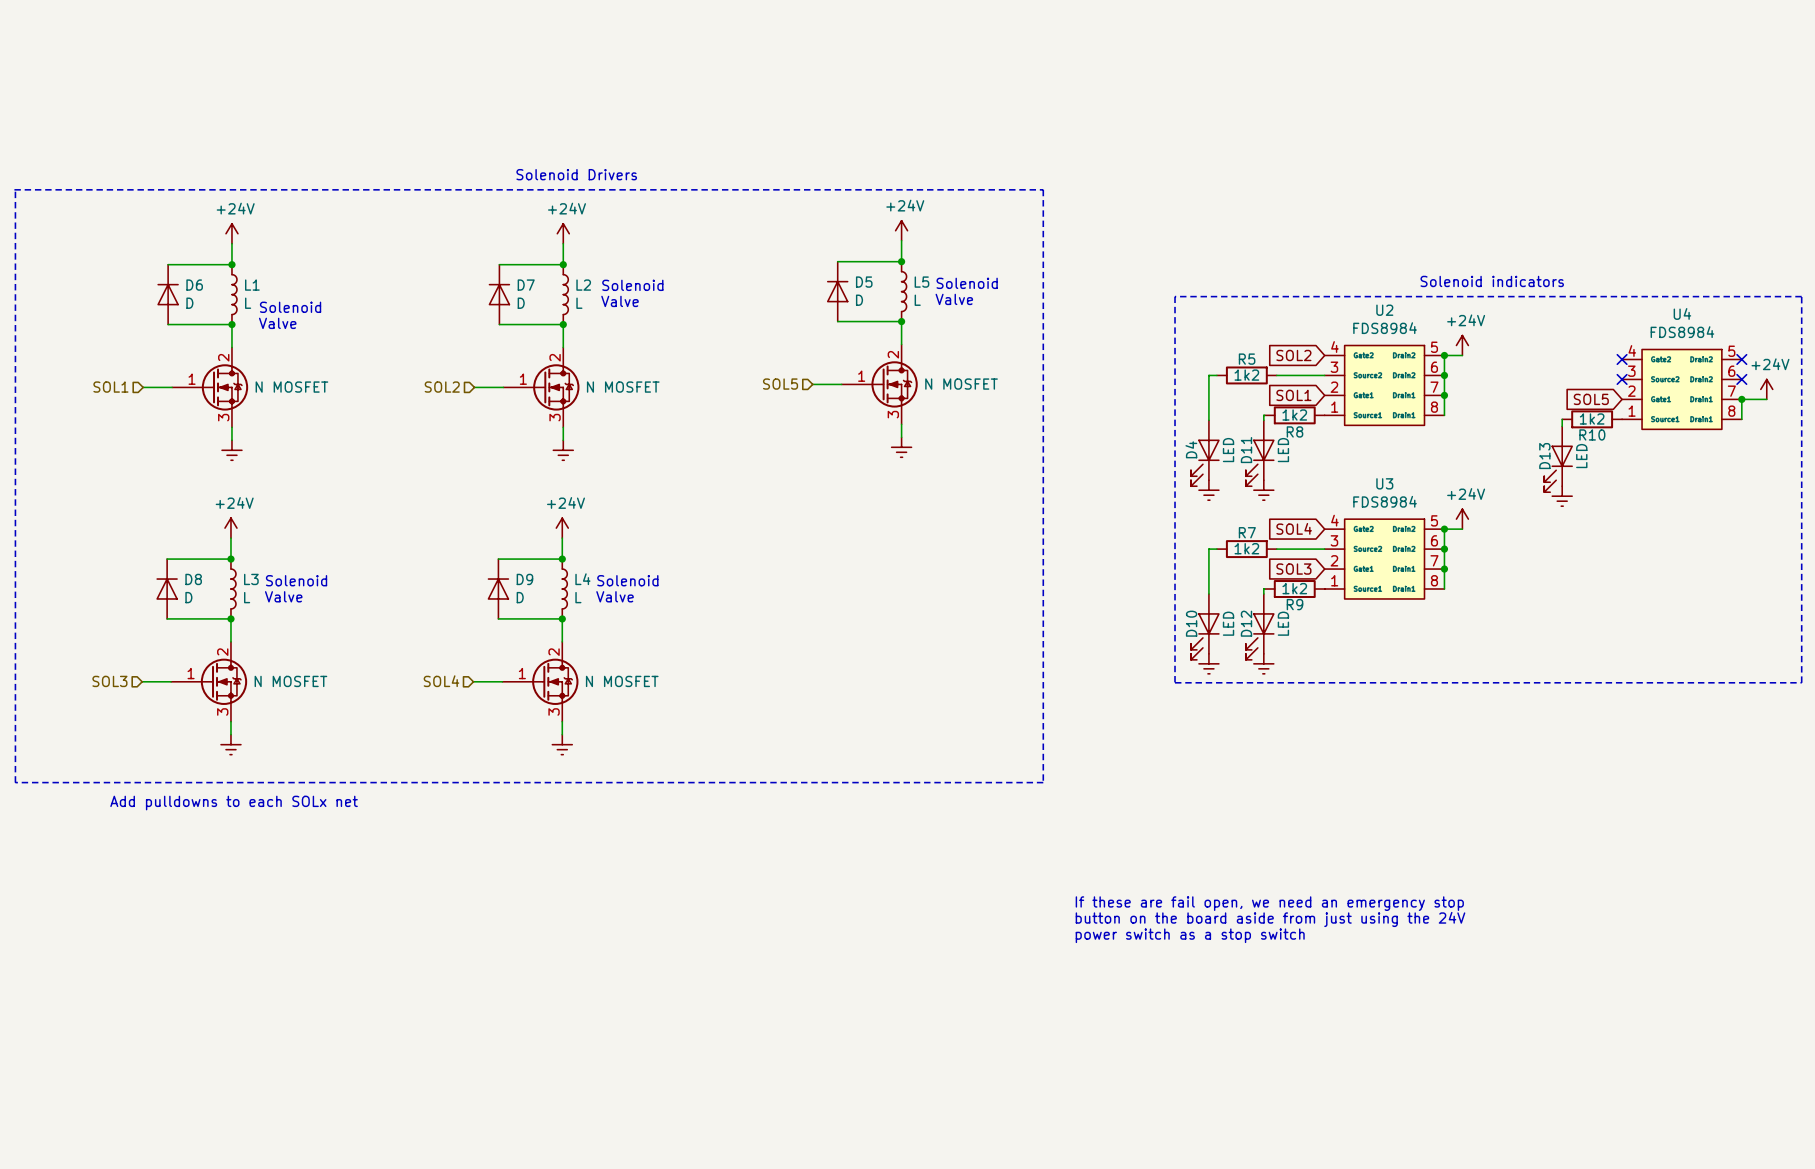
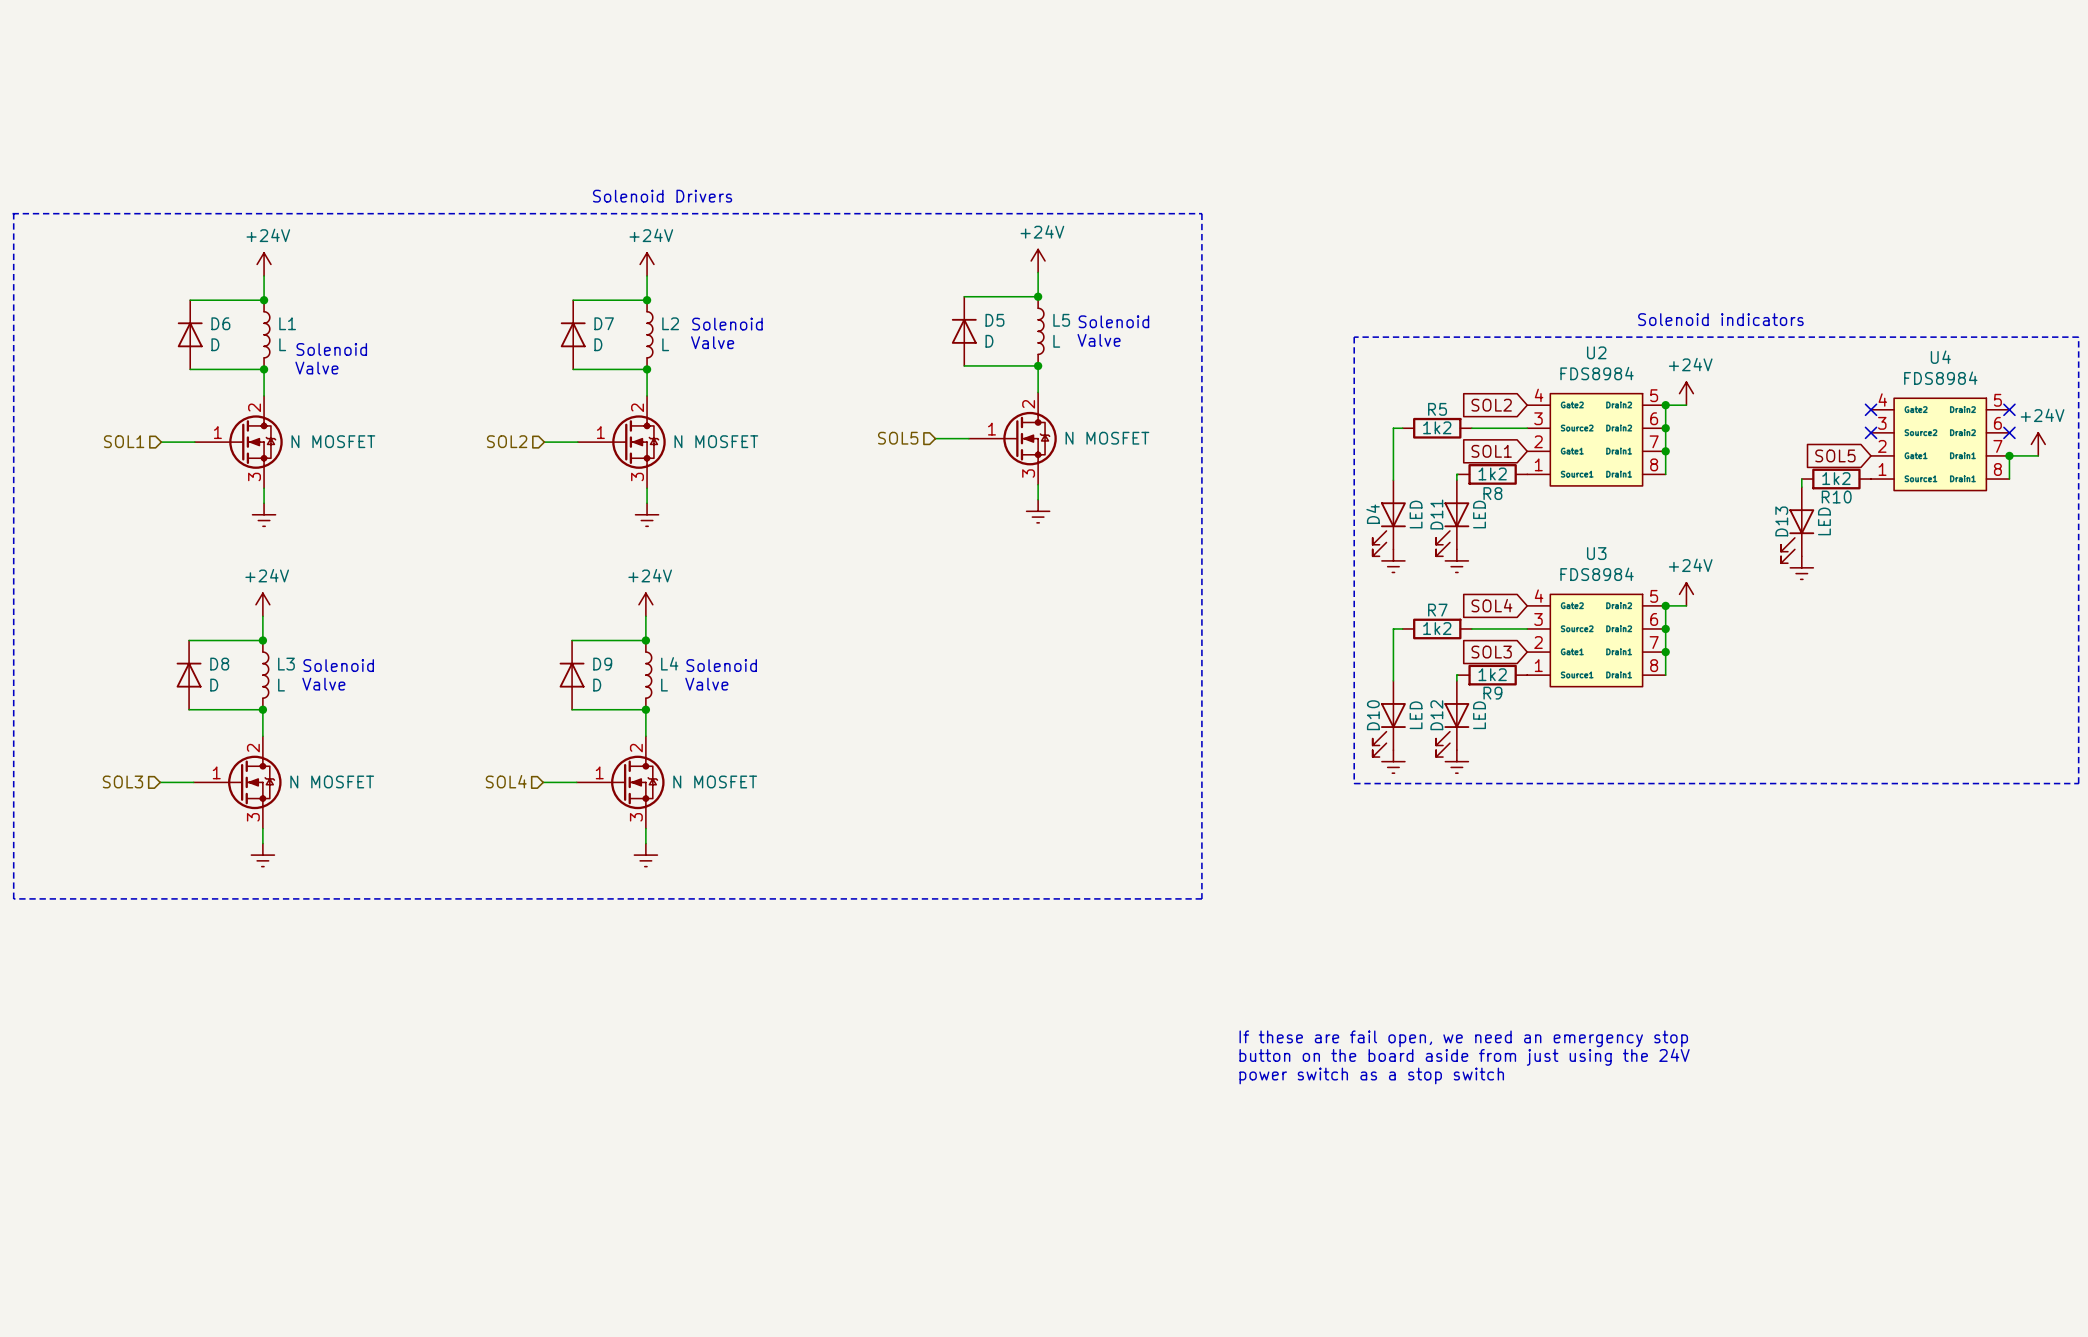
text: Add pulldowns to each SOLx net (234, 803) -> none

